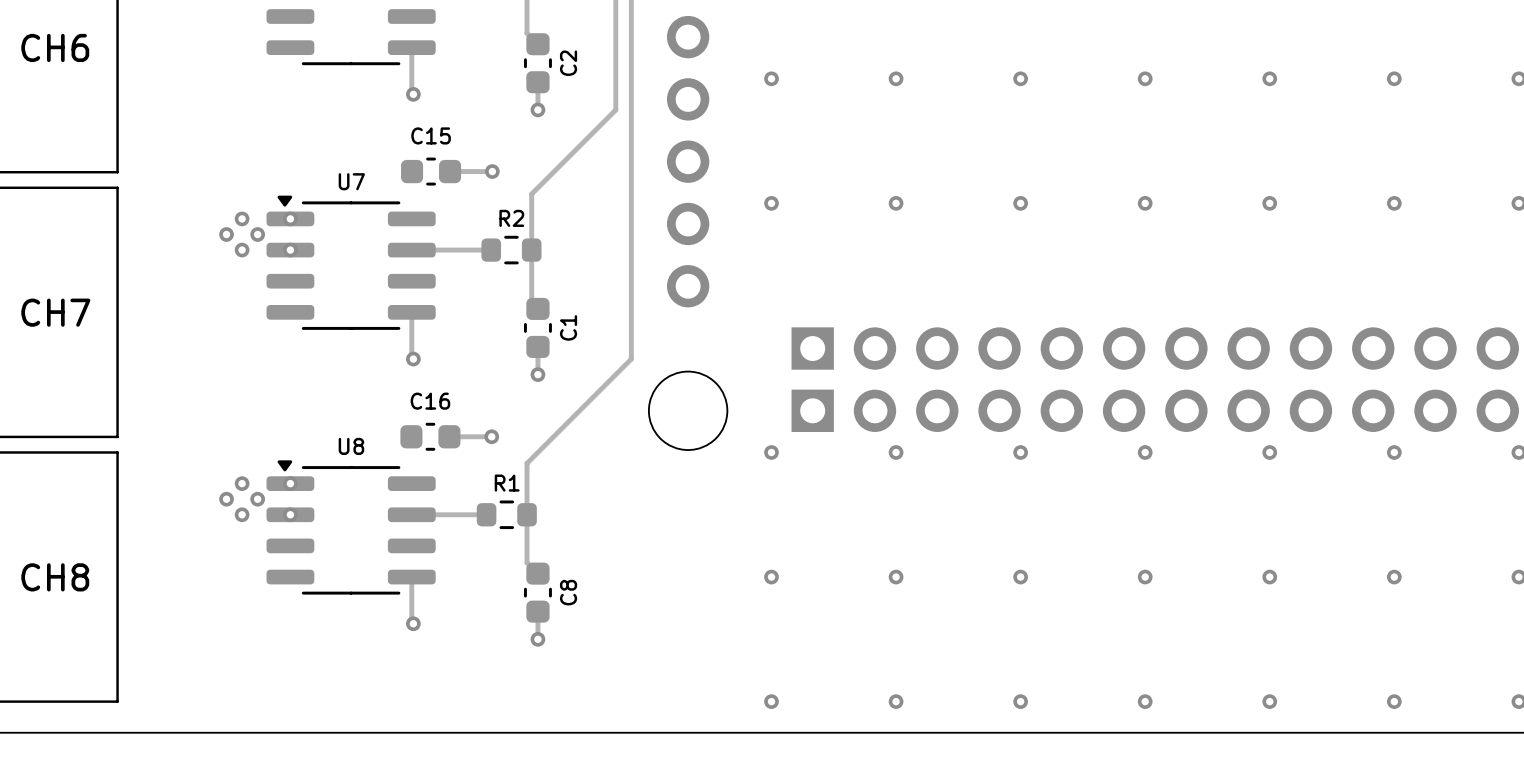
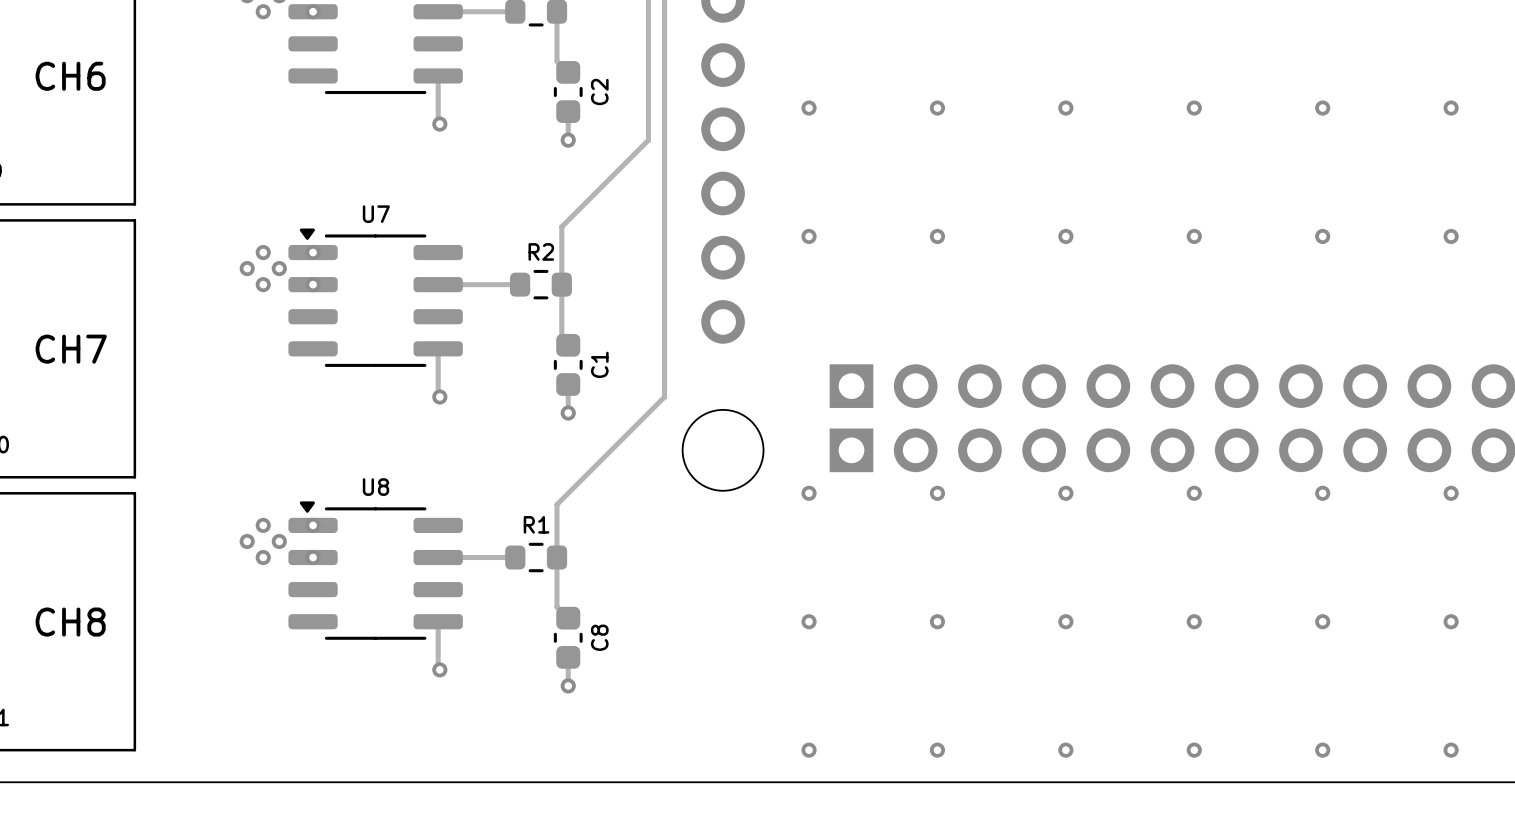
C15: (431, 171) -> none
track: (450, 171) (492, 171) -> none
via: (492, 171) -> none
C16: (430, 436) -> none
track: (449, 436) (491, 436) -> none
via: (491, 436) -> none

